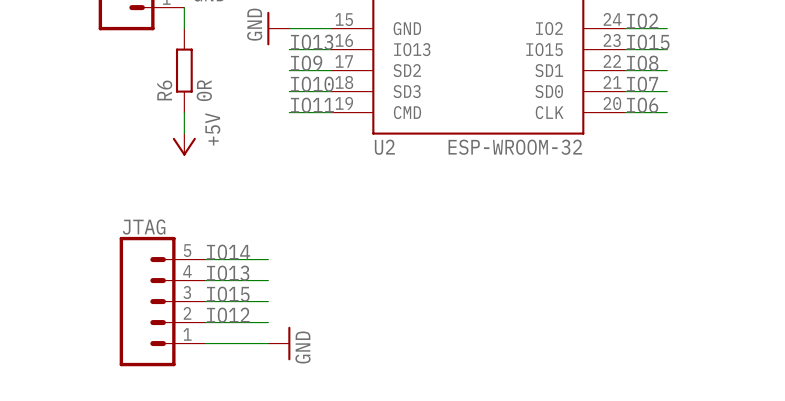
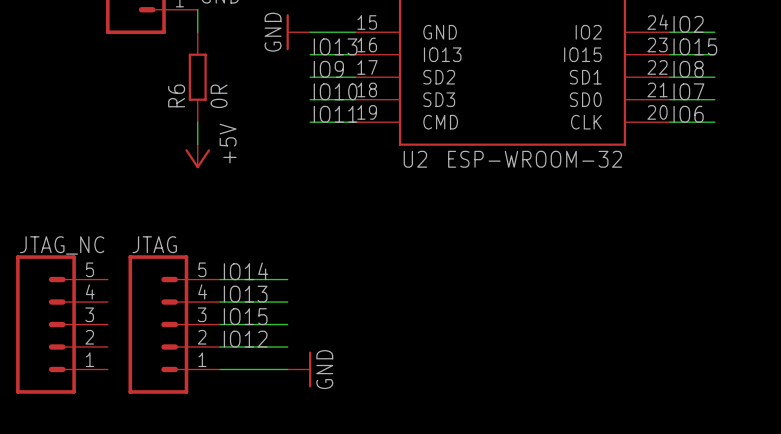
JTAG_NC: none -> (61, 324)

